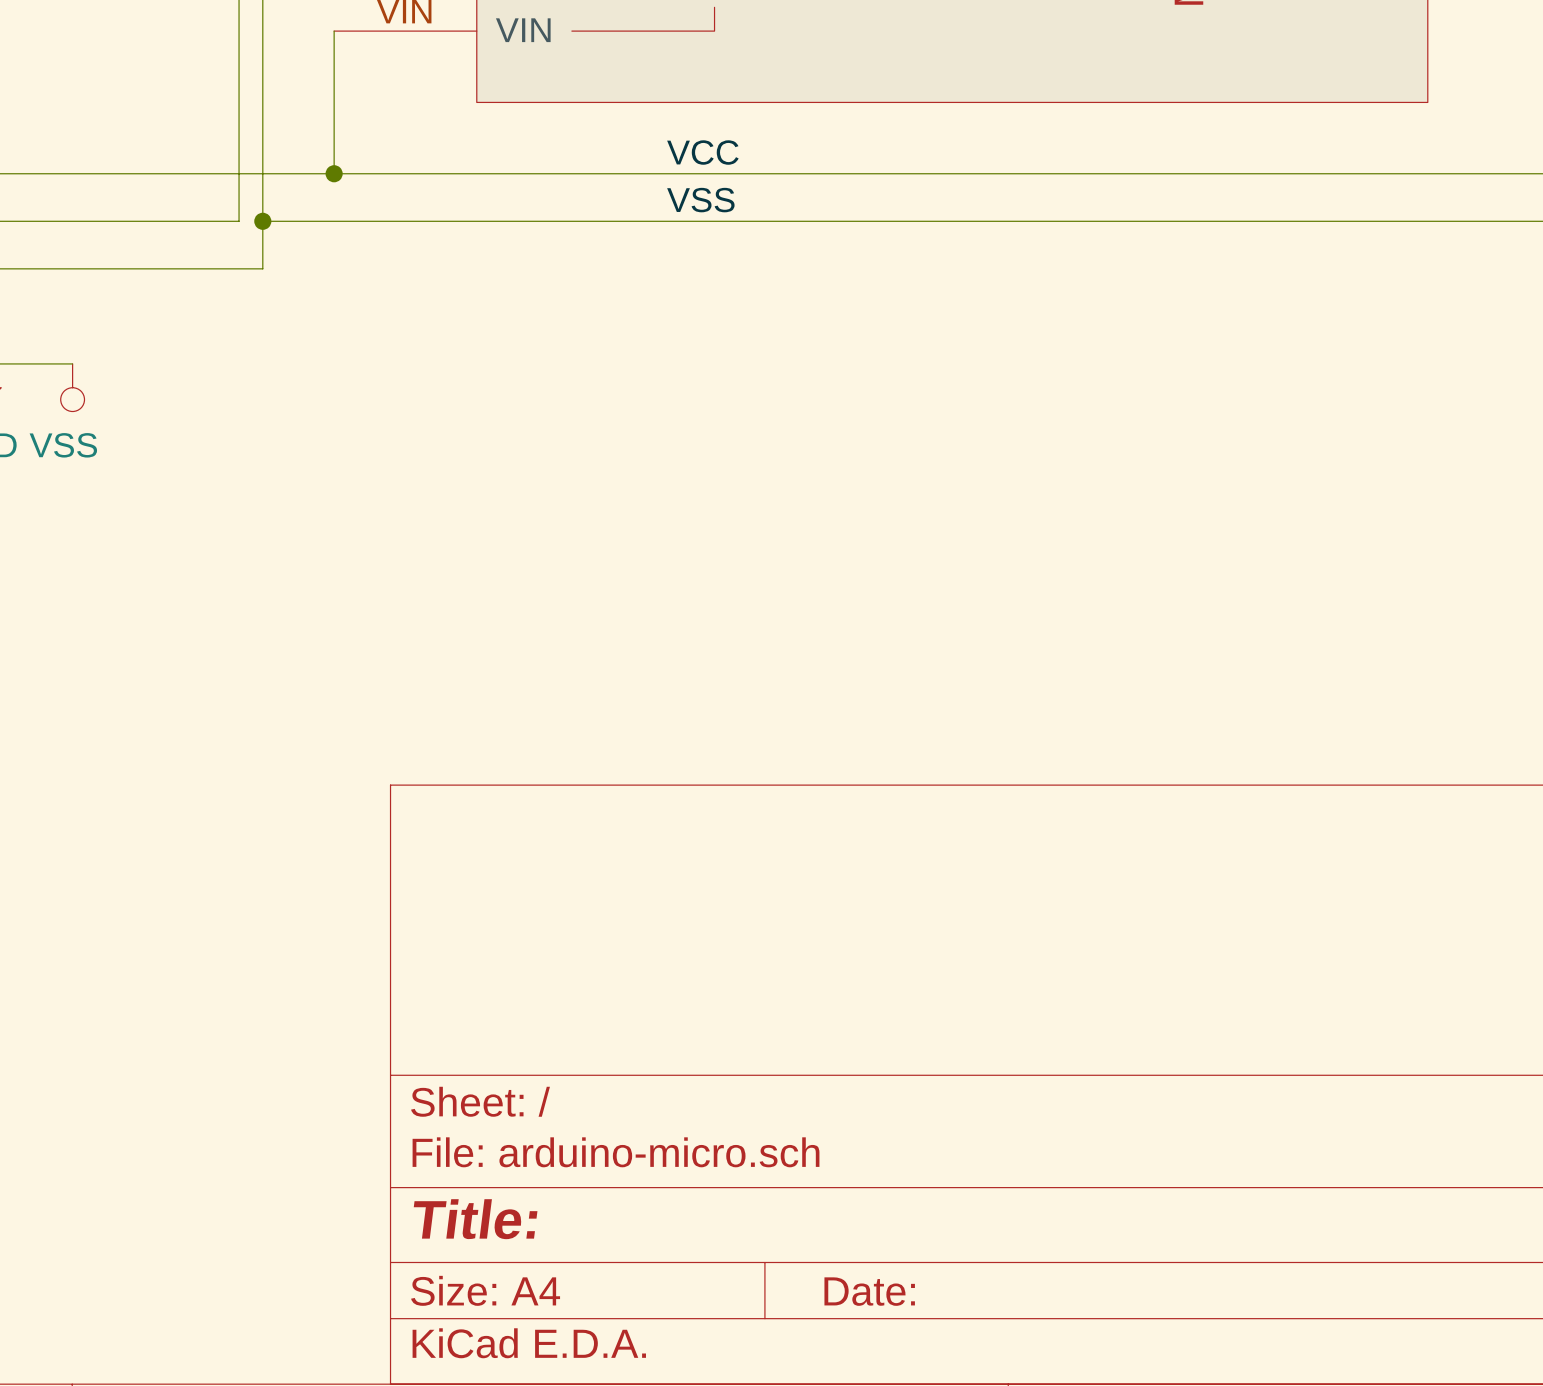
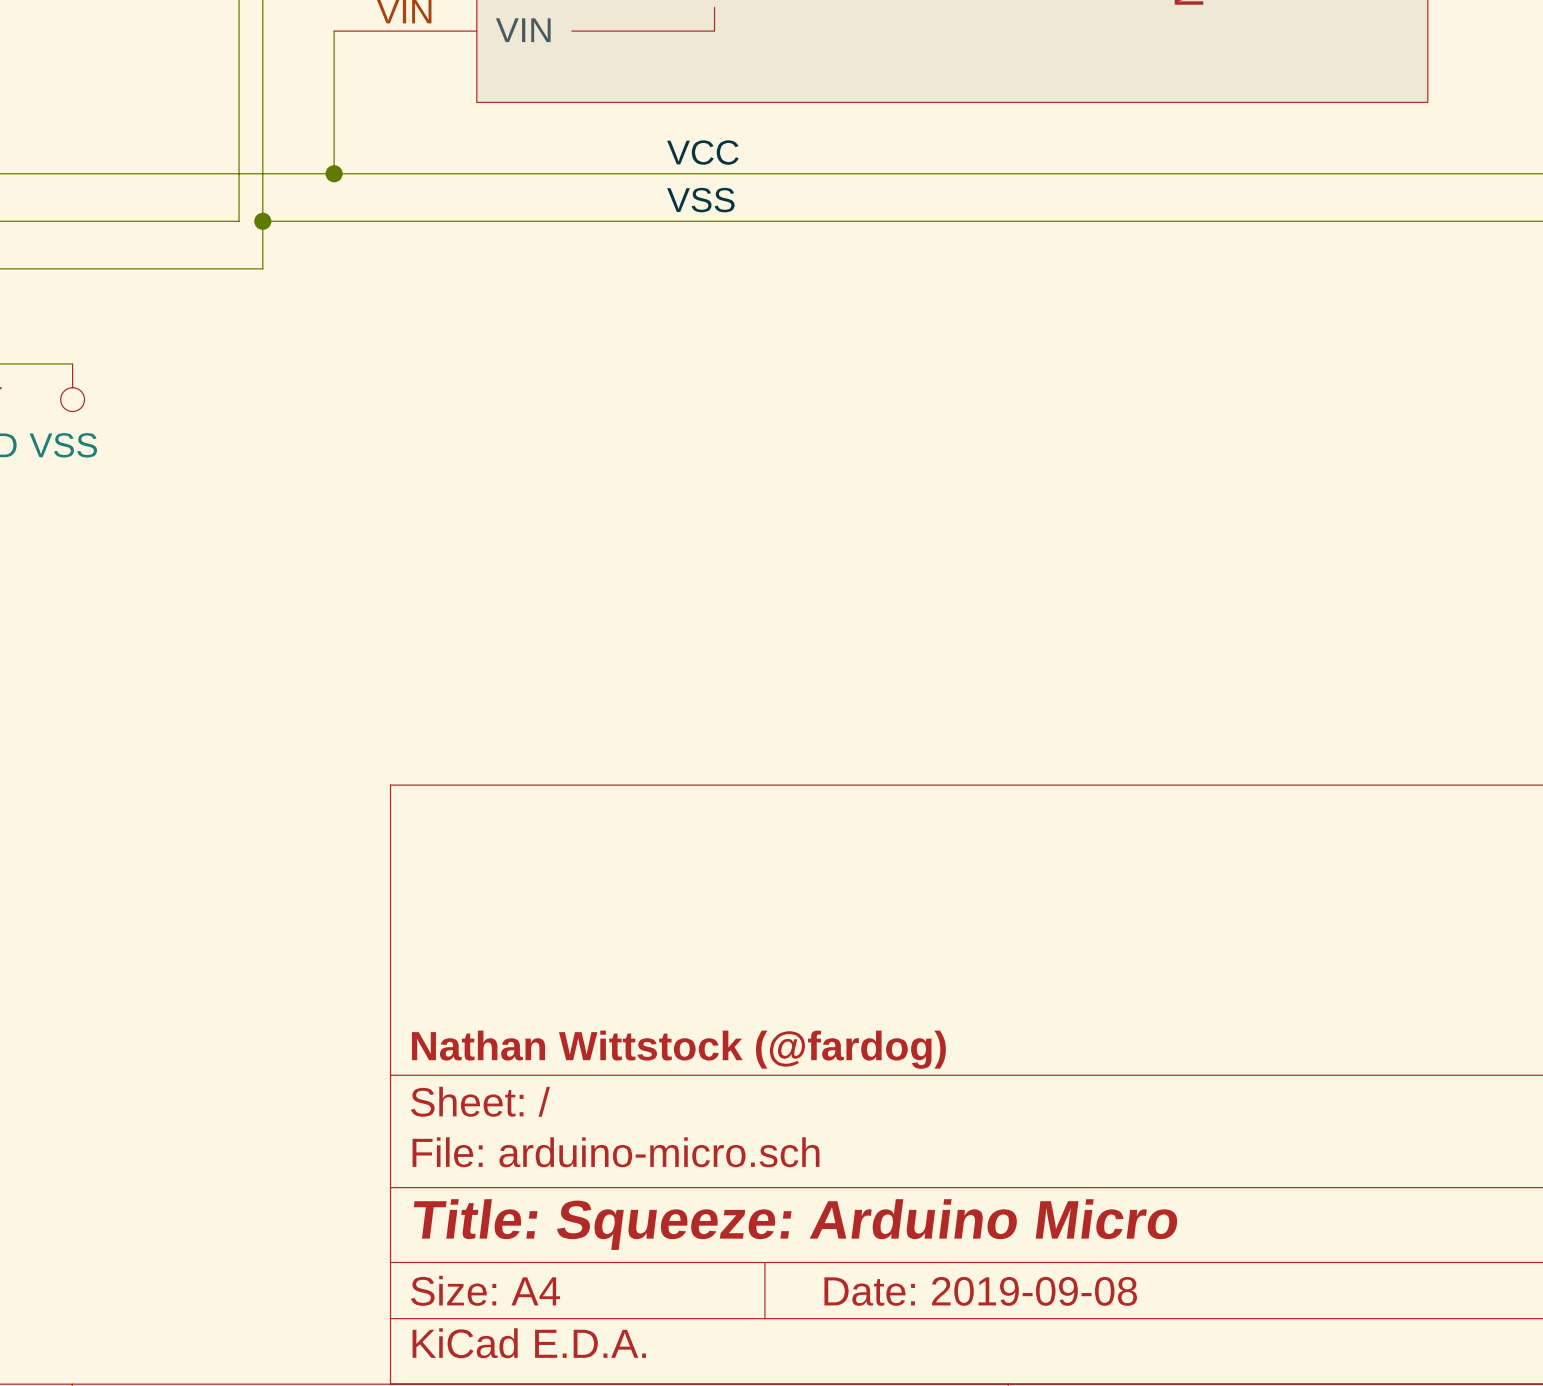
title block: none -> Nathan Wittstock (@fardog) (678, 1049)
title block: Title: (475, 1219) -> Title: Squeeze: Arduino Micro (795, 1224)
title block: Date: (869, 1291) -> Date: 2019-09-08 (980, 1291)

